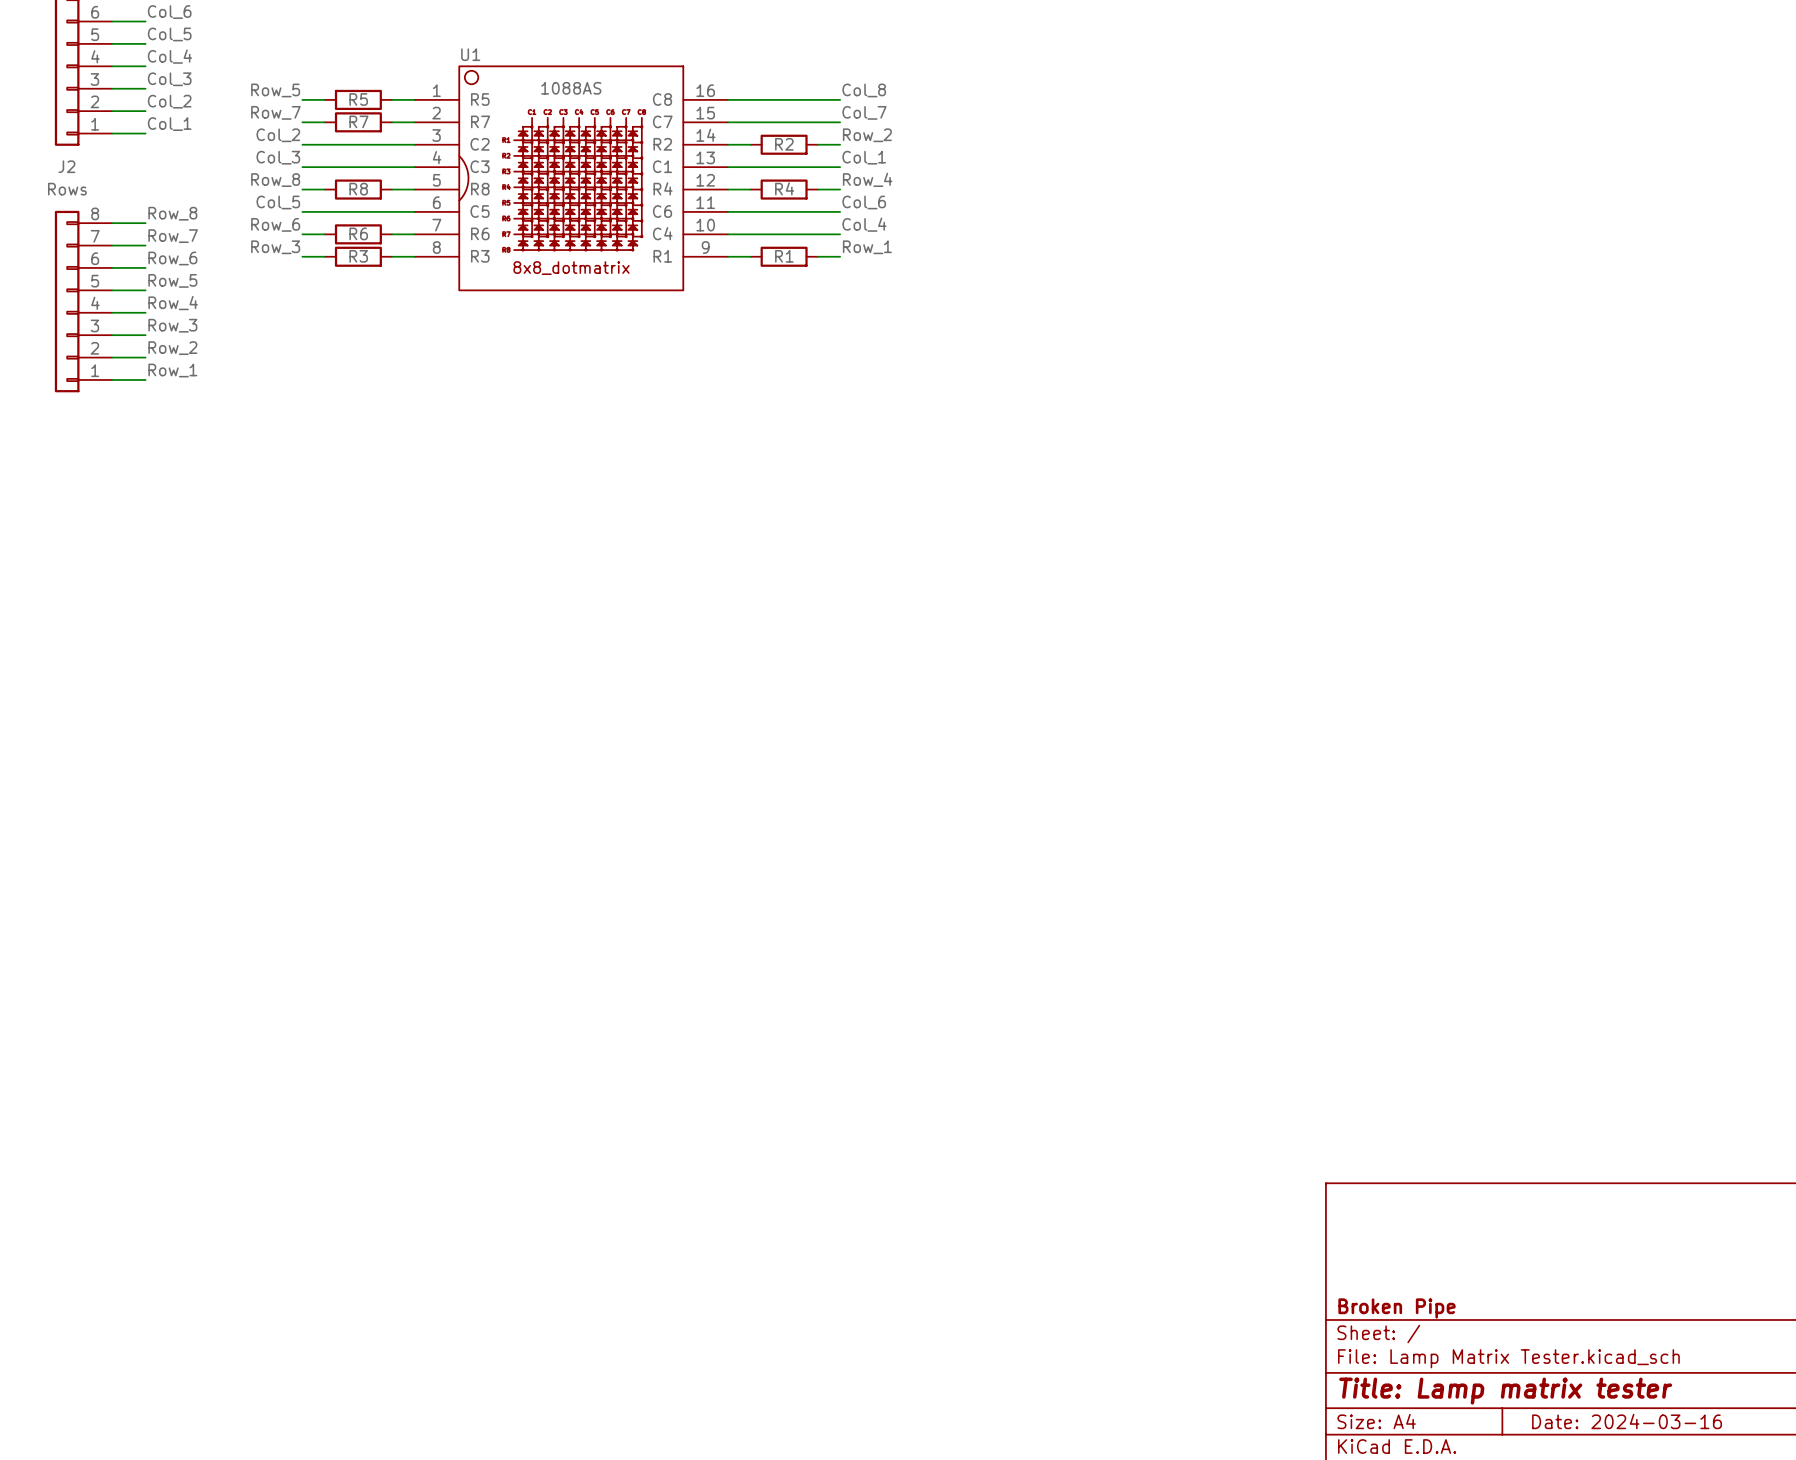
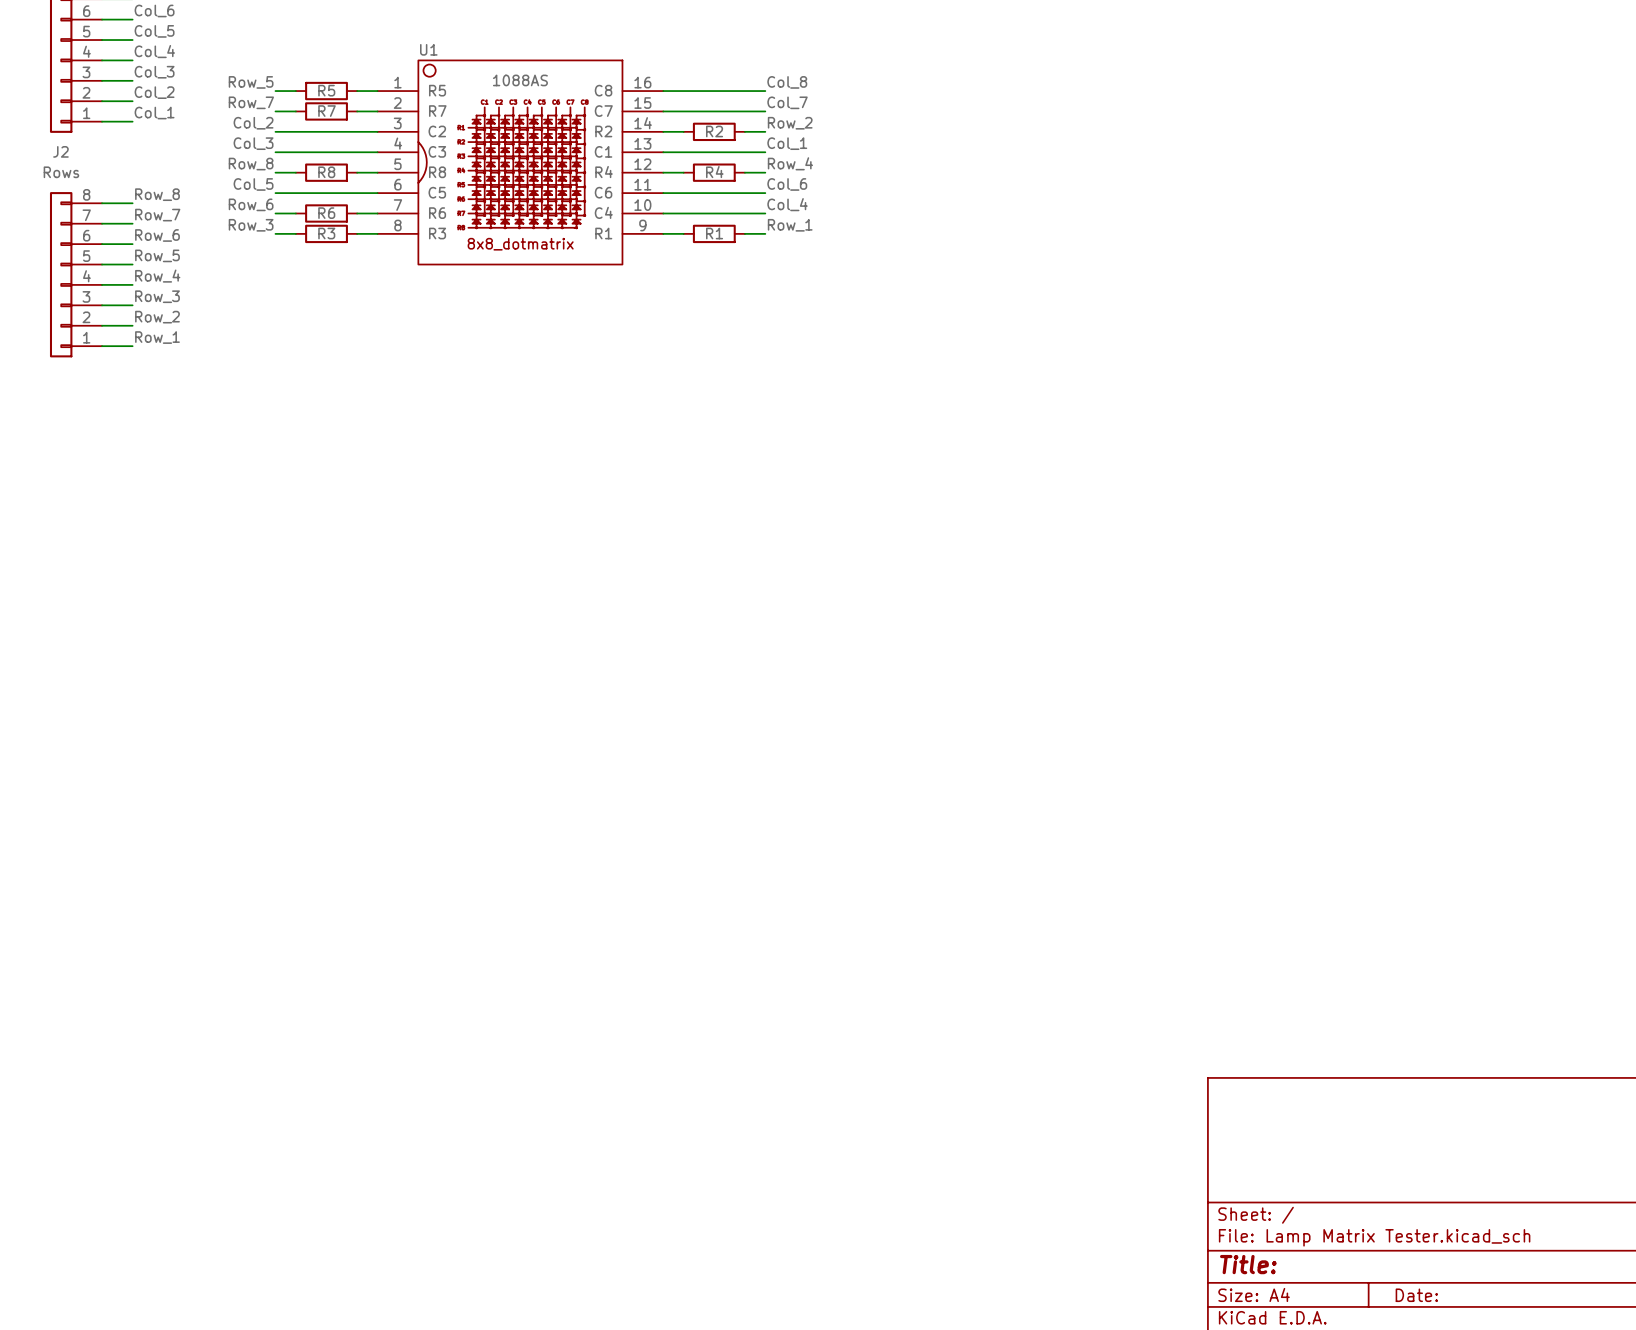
title block: Broken Pipe (1397, 1308) -> none
title block: Title: Lamp matrix tester (1505, 1391) -> Title: (1248, 1264)
title block: Date: 2024-03-16 (1627, 1421) -> Date: (1416, 1295)

